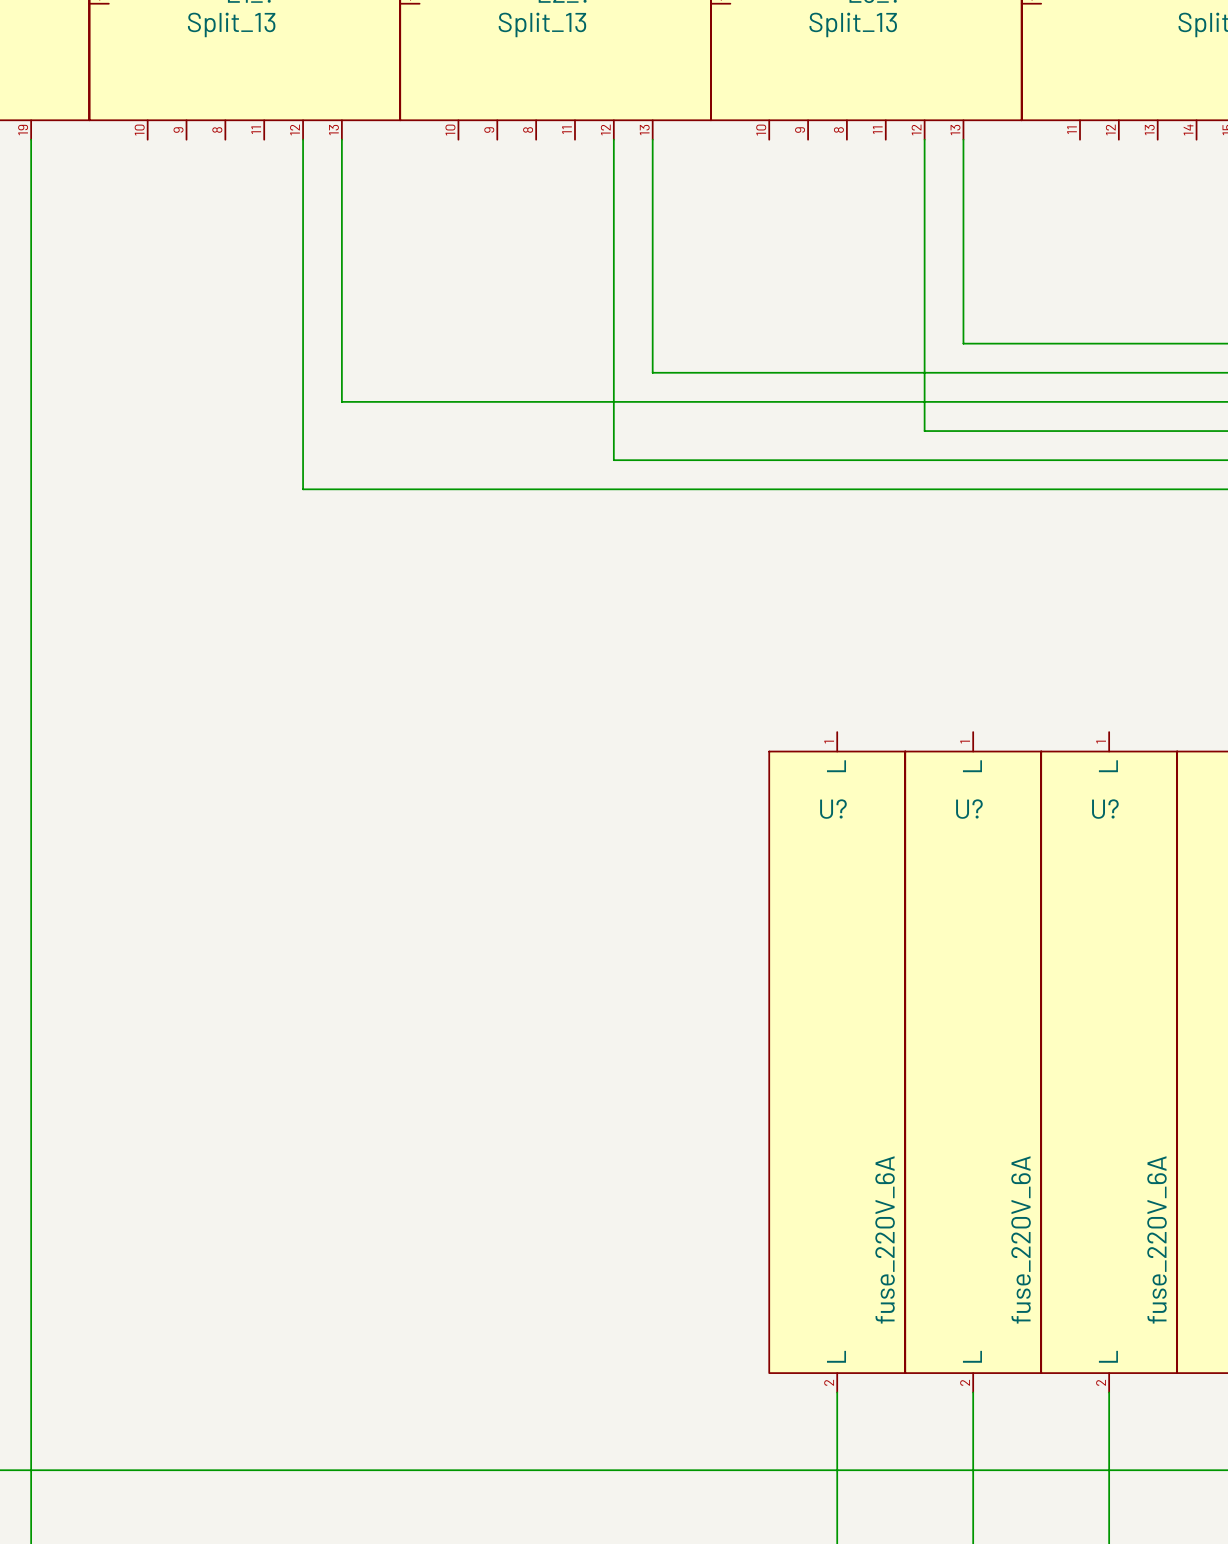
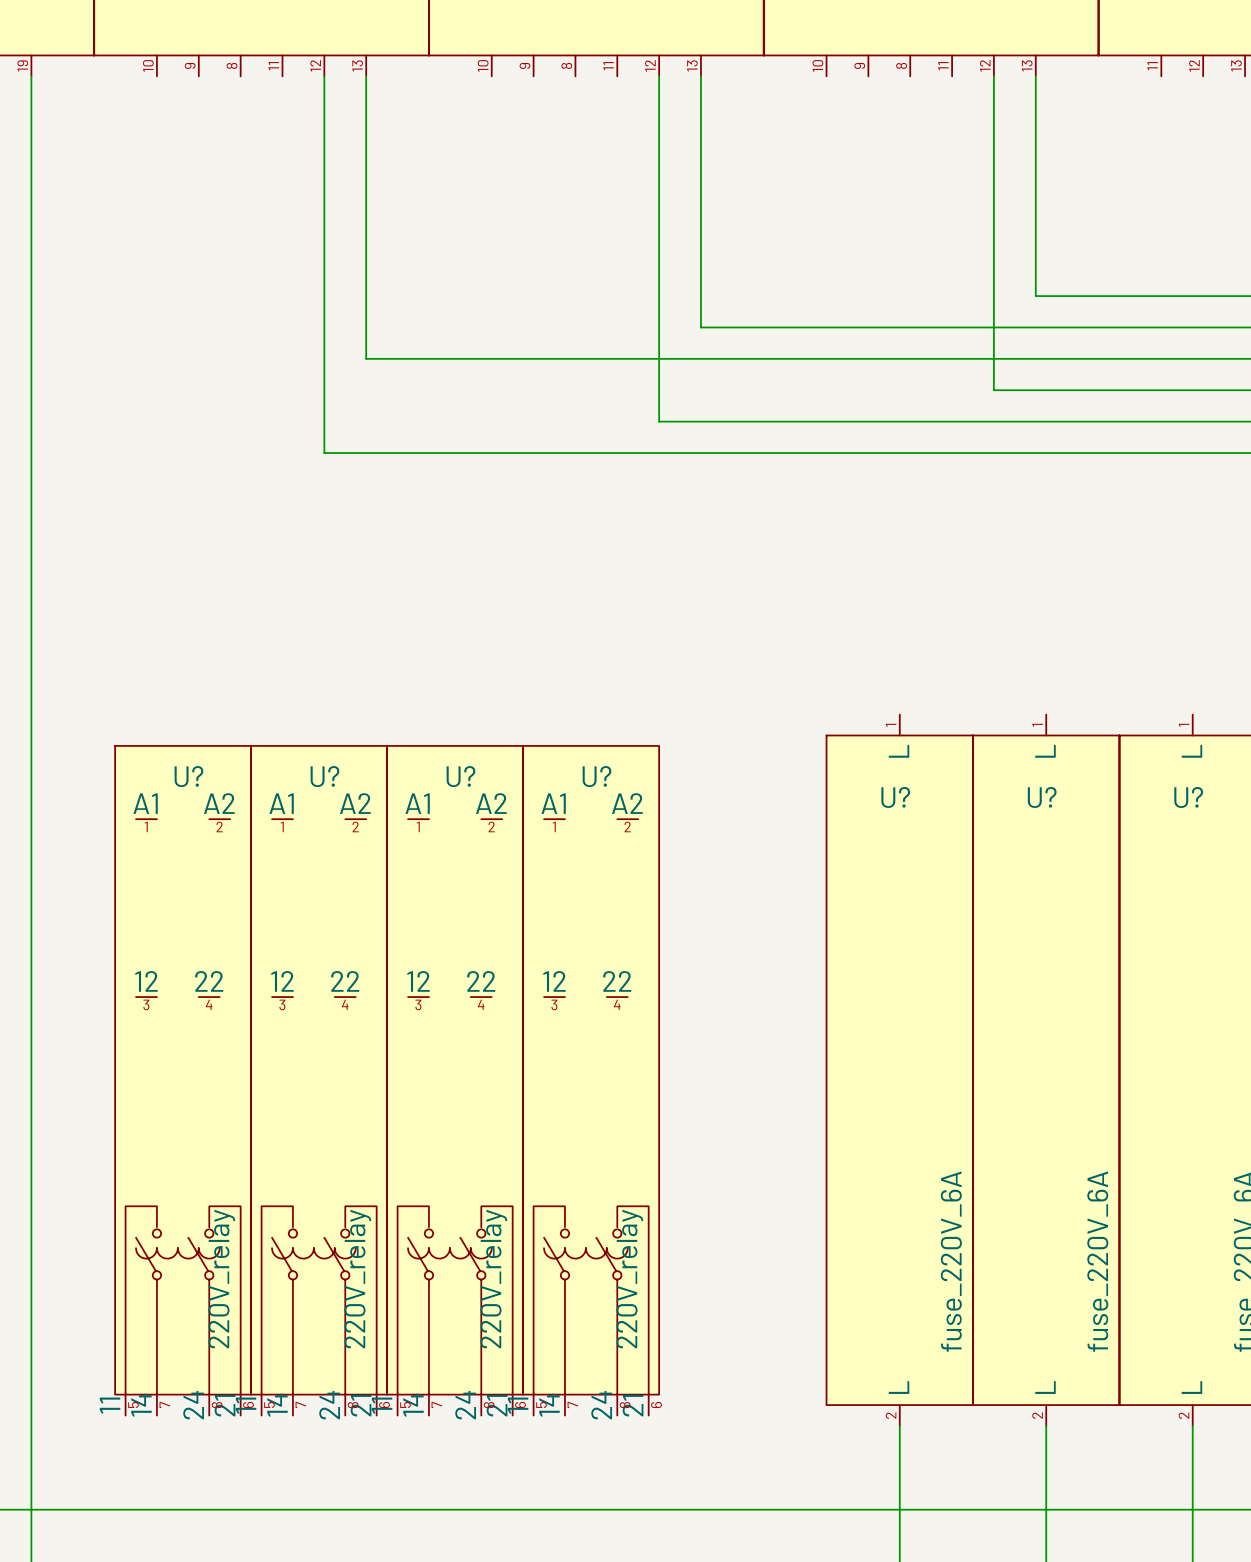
U?: none -> 220V_relay (183, 1080)
U?: none -> 220V_relay (319, 1080)
U?: none -> 220V_relay (455, 1080)
U?: none -> 220V_relay (591, 1080)

